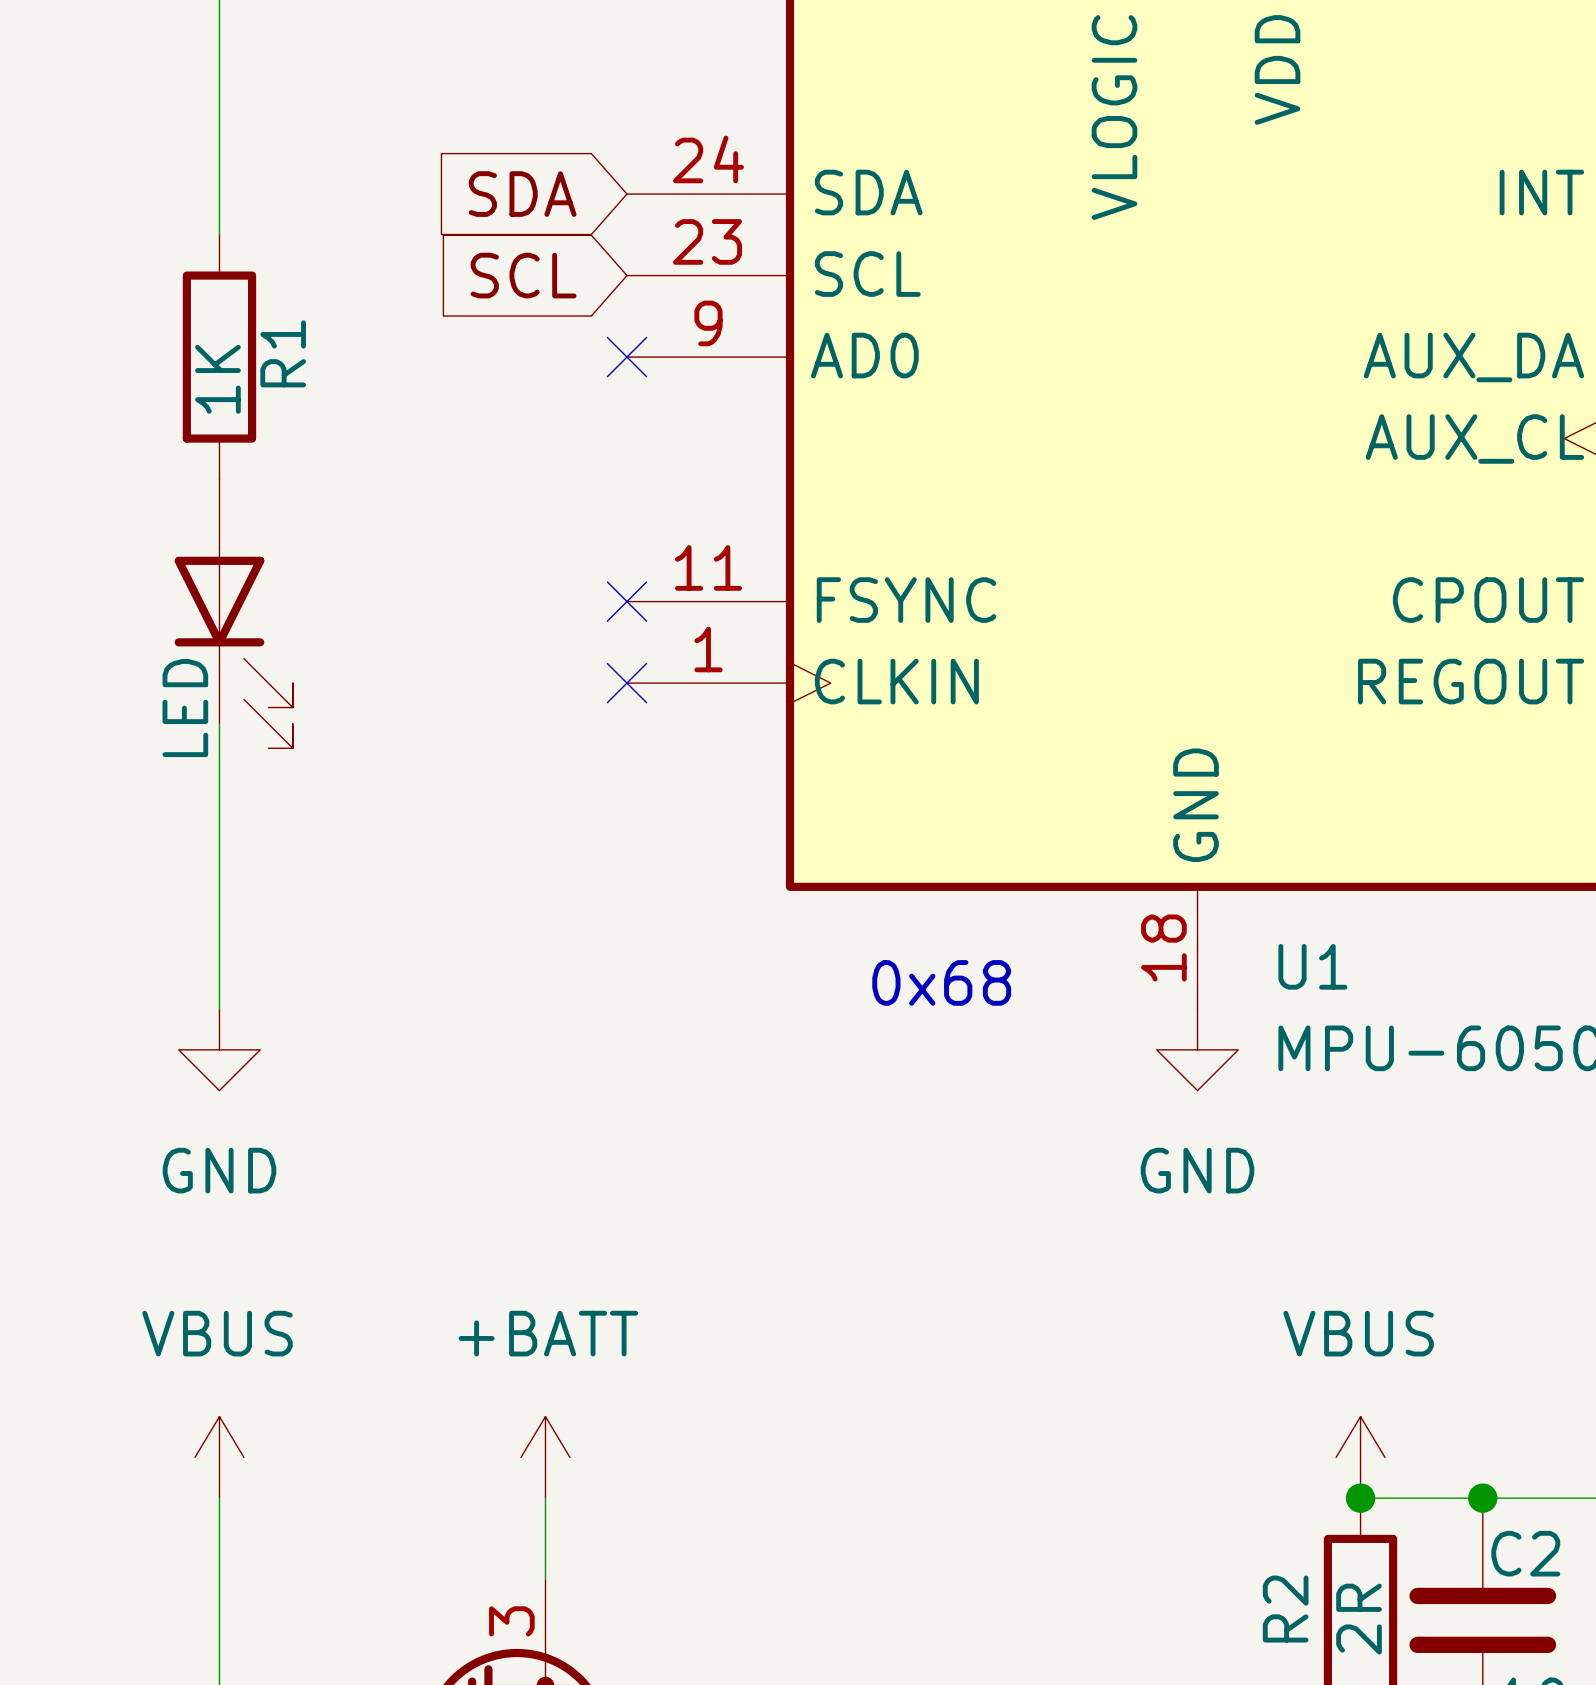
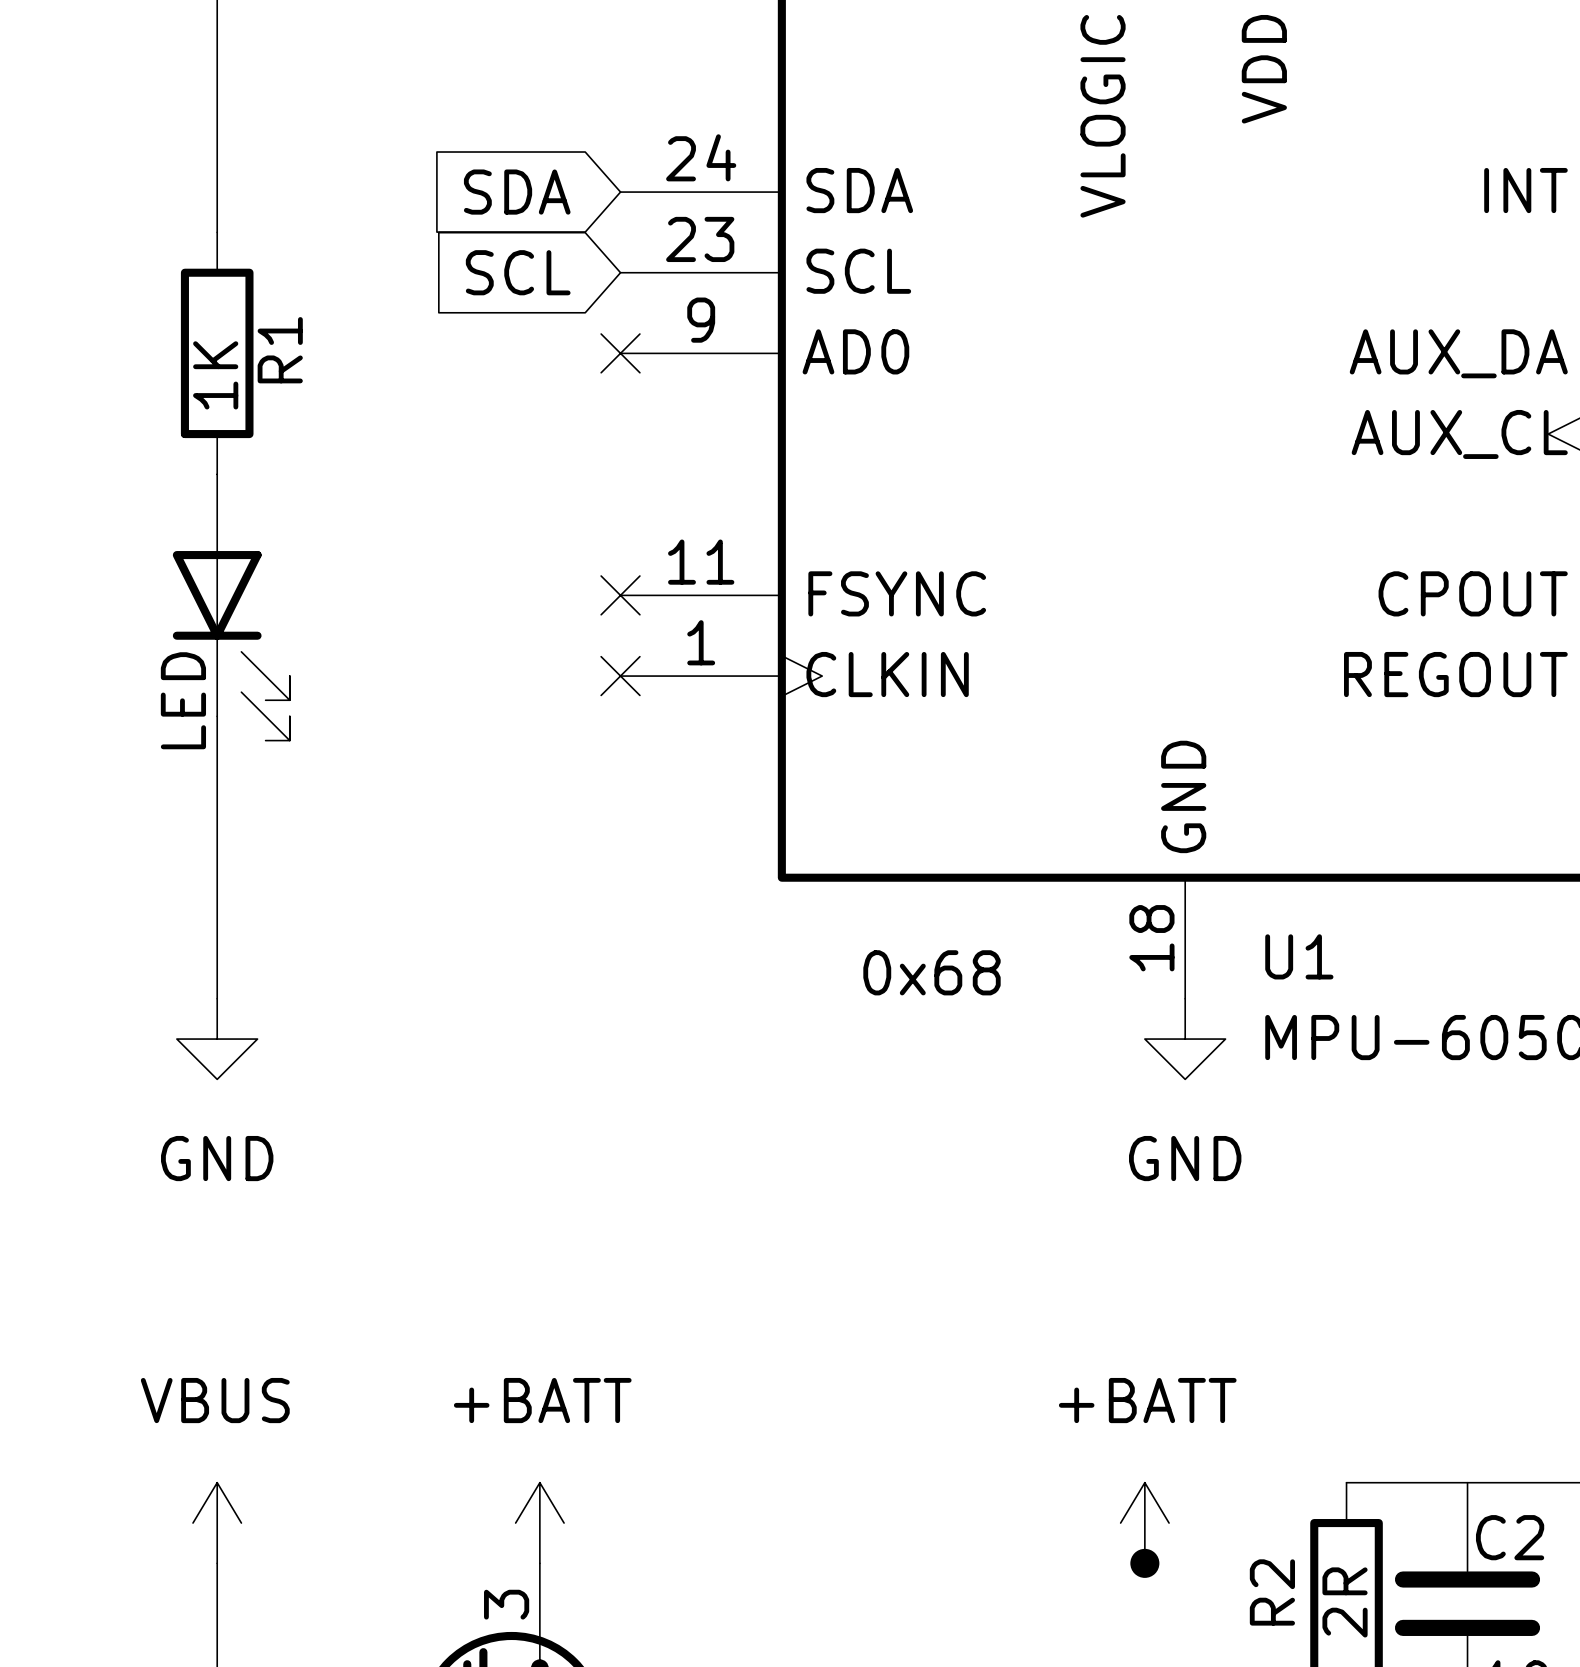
power symbol position: VBUS (219, 1457) -> VBUS (217, 1523)
power symbol position: +BATT (545, 1457) -> +BATT (539, 1523)
power symbol: VBUS (1360, 1457) -> none
junction: (1360, 1498) -> none
junction: (1482, 1498) -> none
power symbol: none -> +BATT (1144, 1523)
junction: none -> (1144, 1563)

